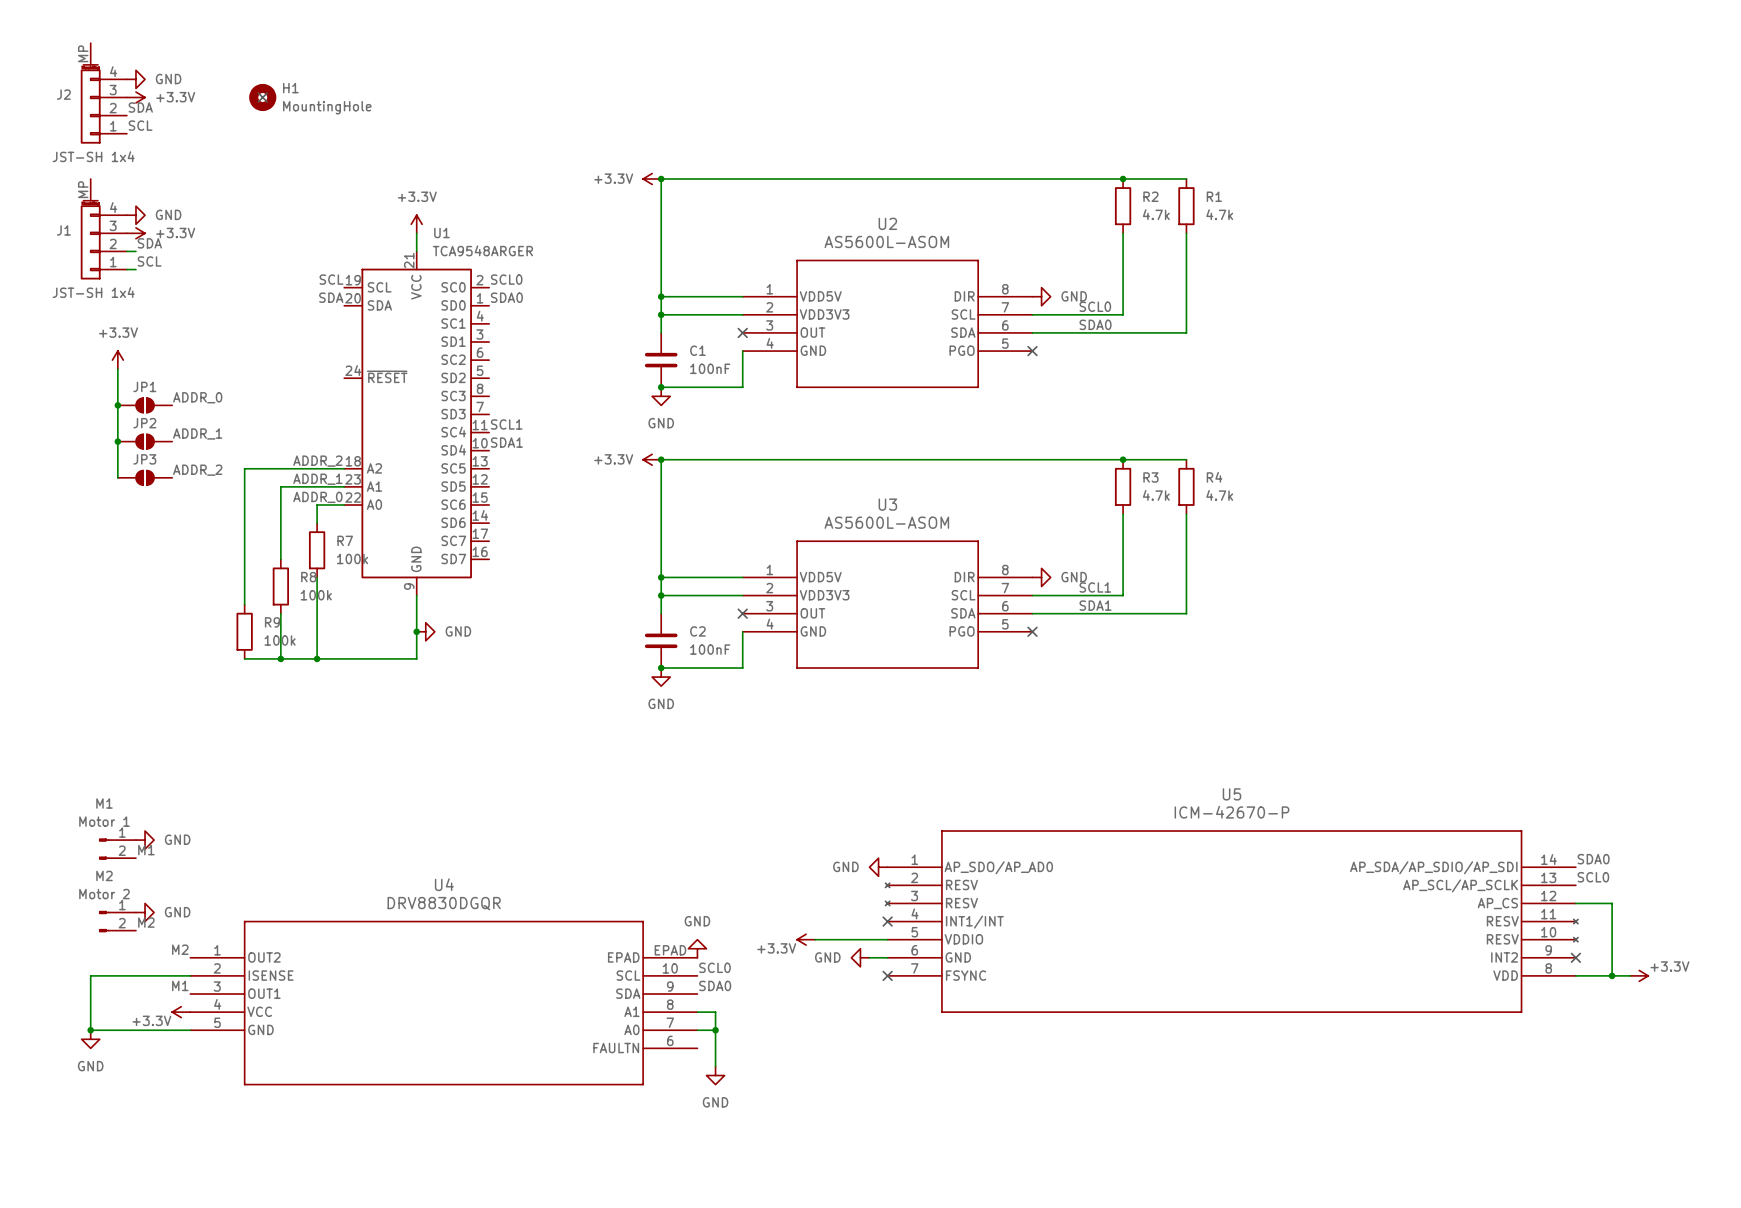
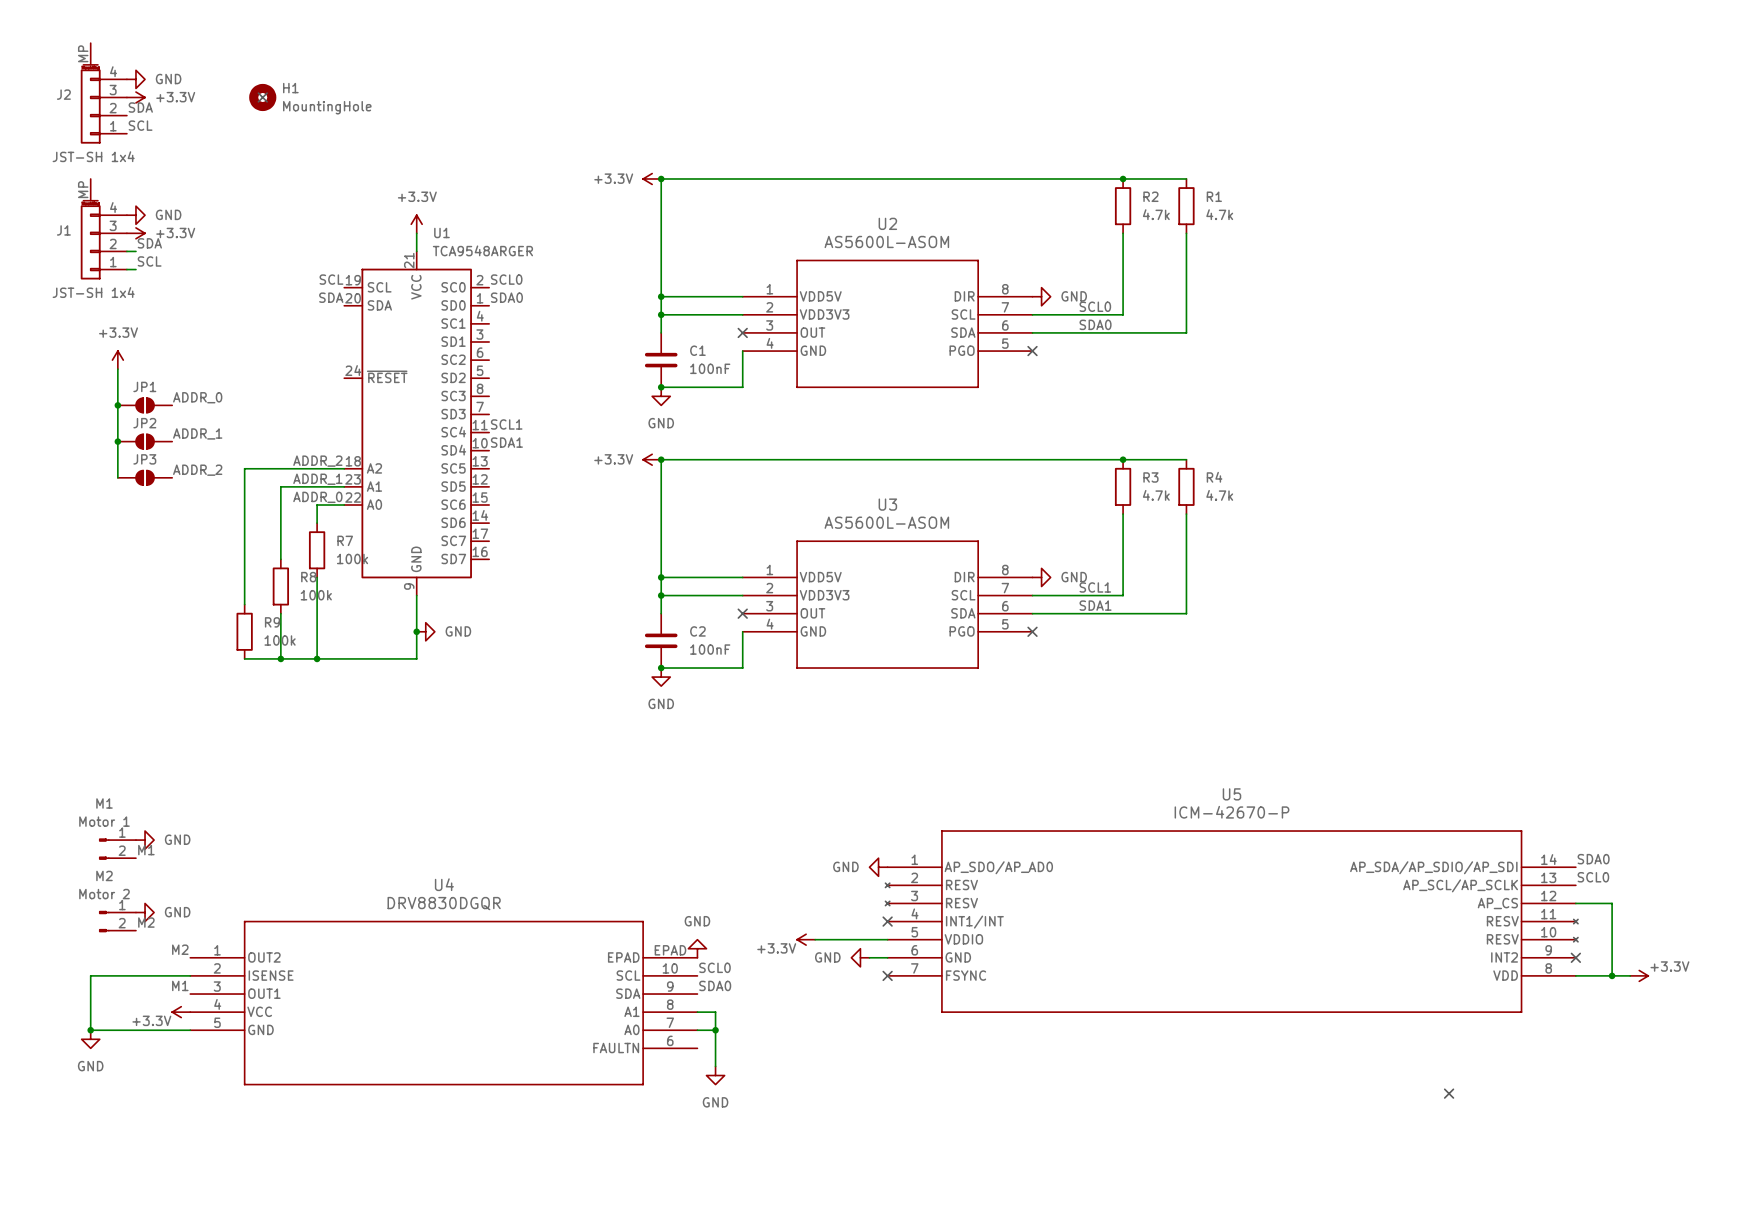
no-connect mark: none -> (1449, 1093)

